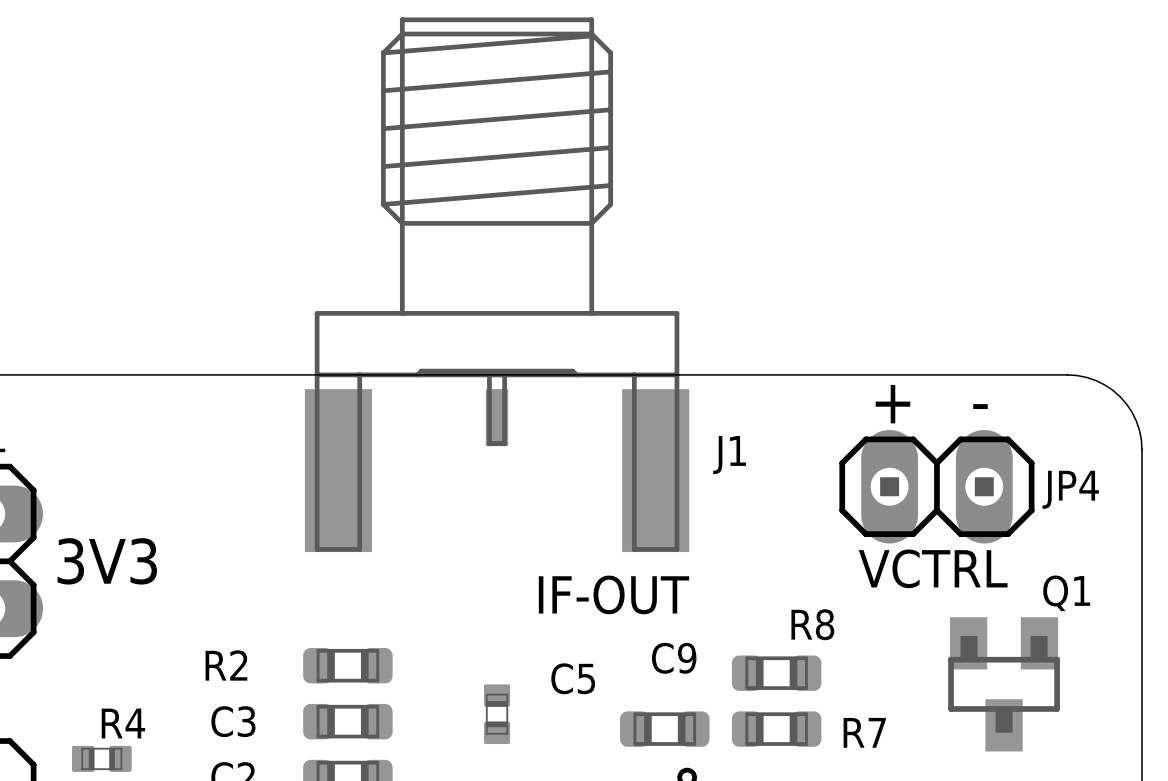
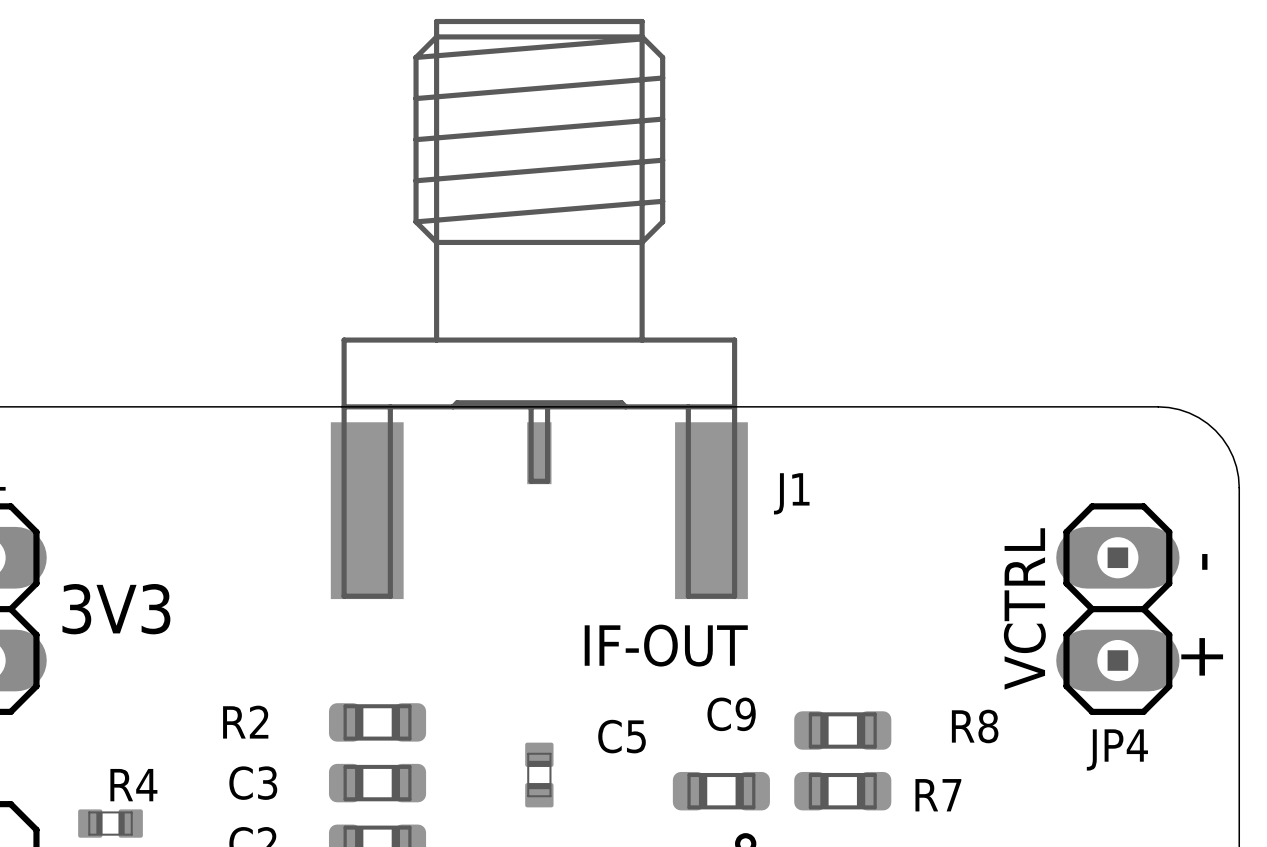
text rotation: 0° (892, 404) -> 90° counterclockwise (1202, 656)
text position: + (892, 404) -> + (1202, 656)
text rotation: 0° (980, 406) -> 90° counterclockwise (1204, 561)
text position: - (980, 406) -> - (1204, 561)
JP4 rotation: 0° (936, 486) -> 90° clockwise (1117, 609)
JP4 position: (936, 486) -> (1117, 609)
text rotation: 0° (933, 568) -> 90° counterclockwise (1024, 608)
R8 name position: R8 (812, 624) -> R8 (975, 726)
Q1: (1004, 684) -> none

